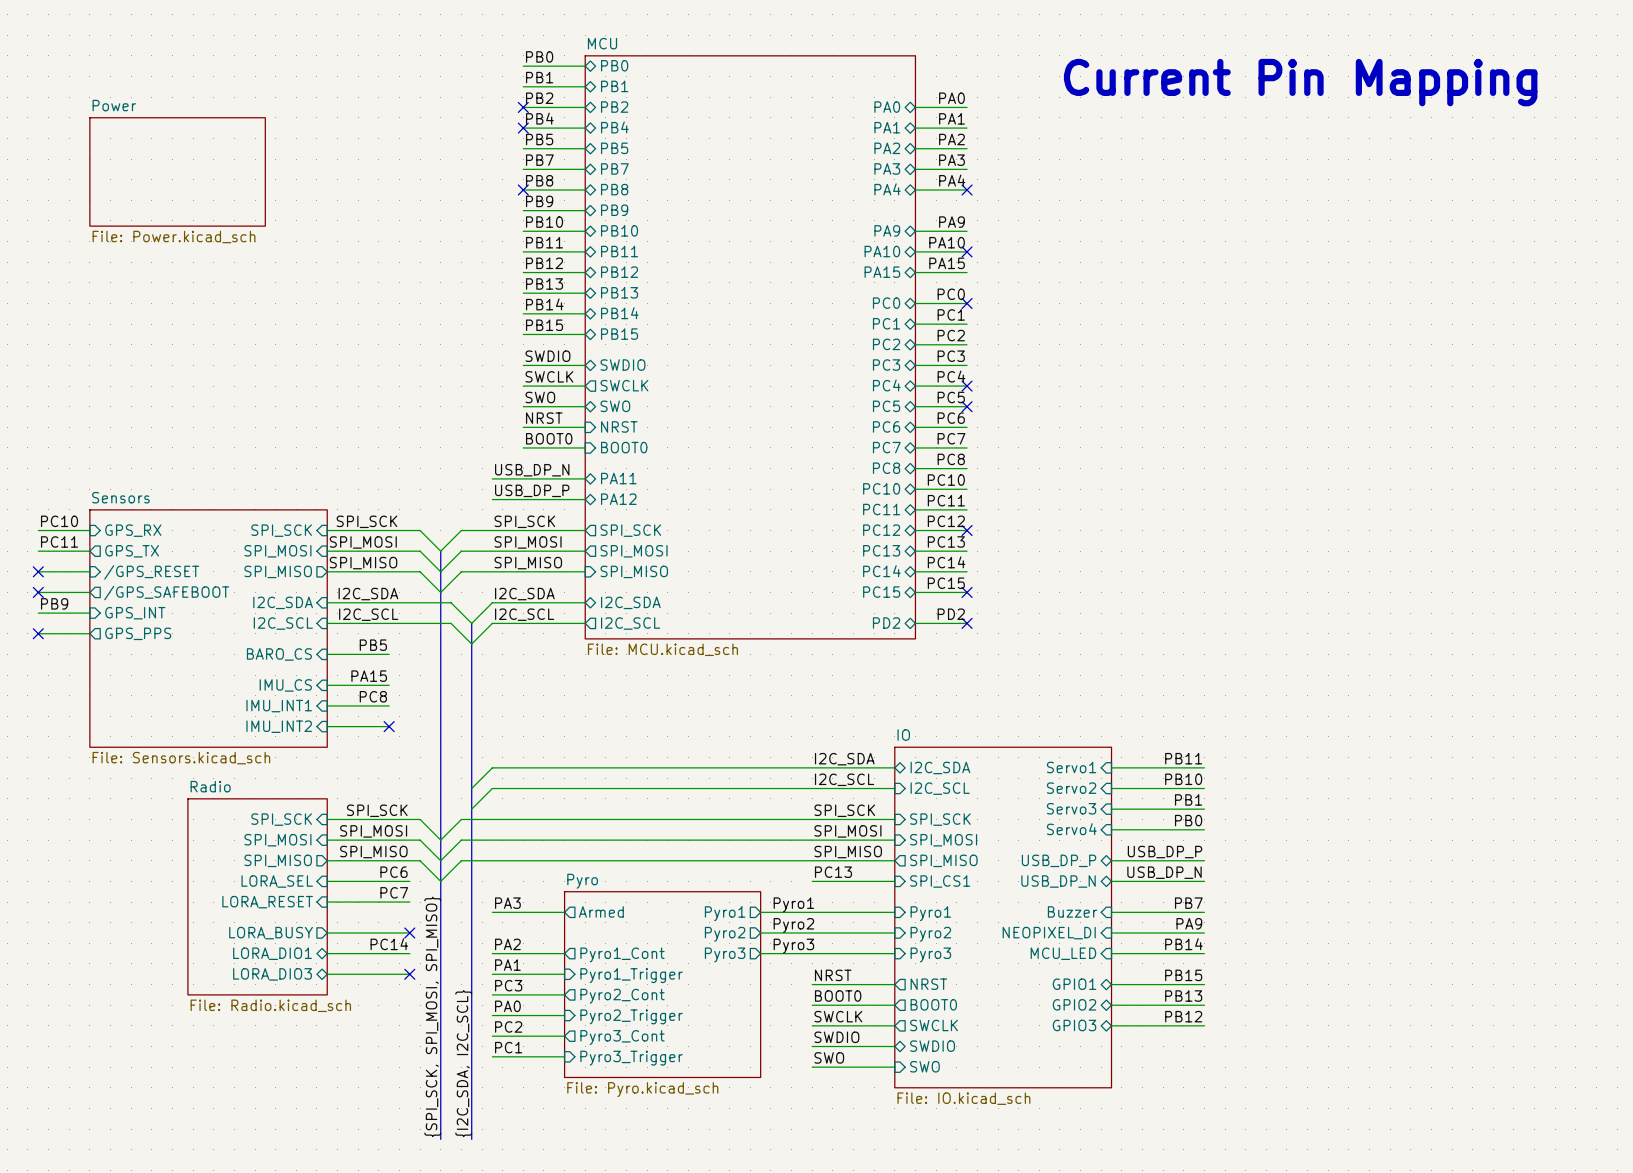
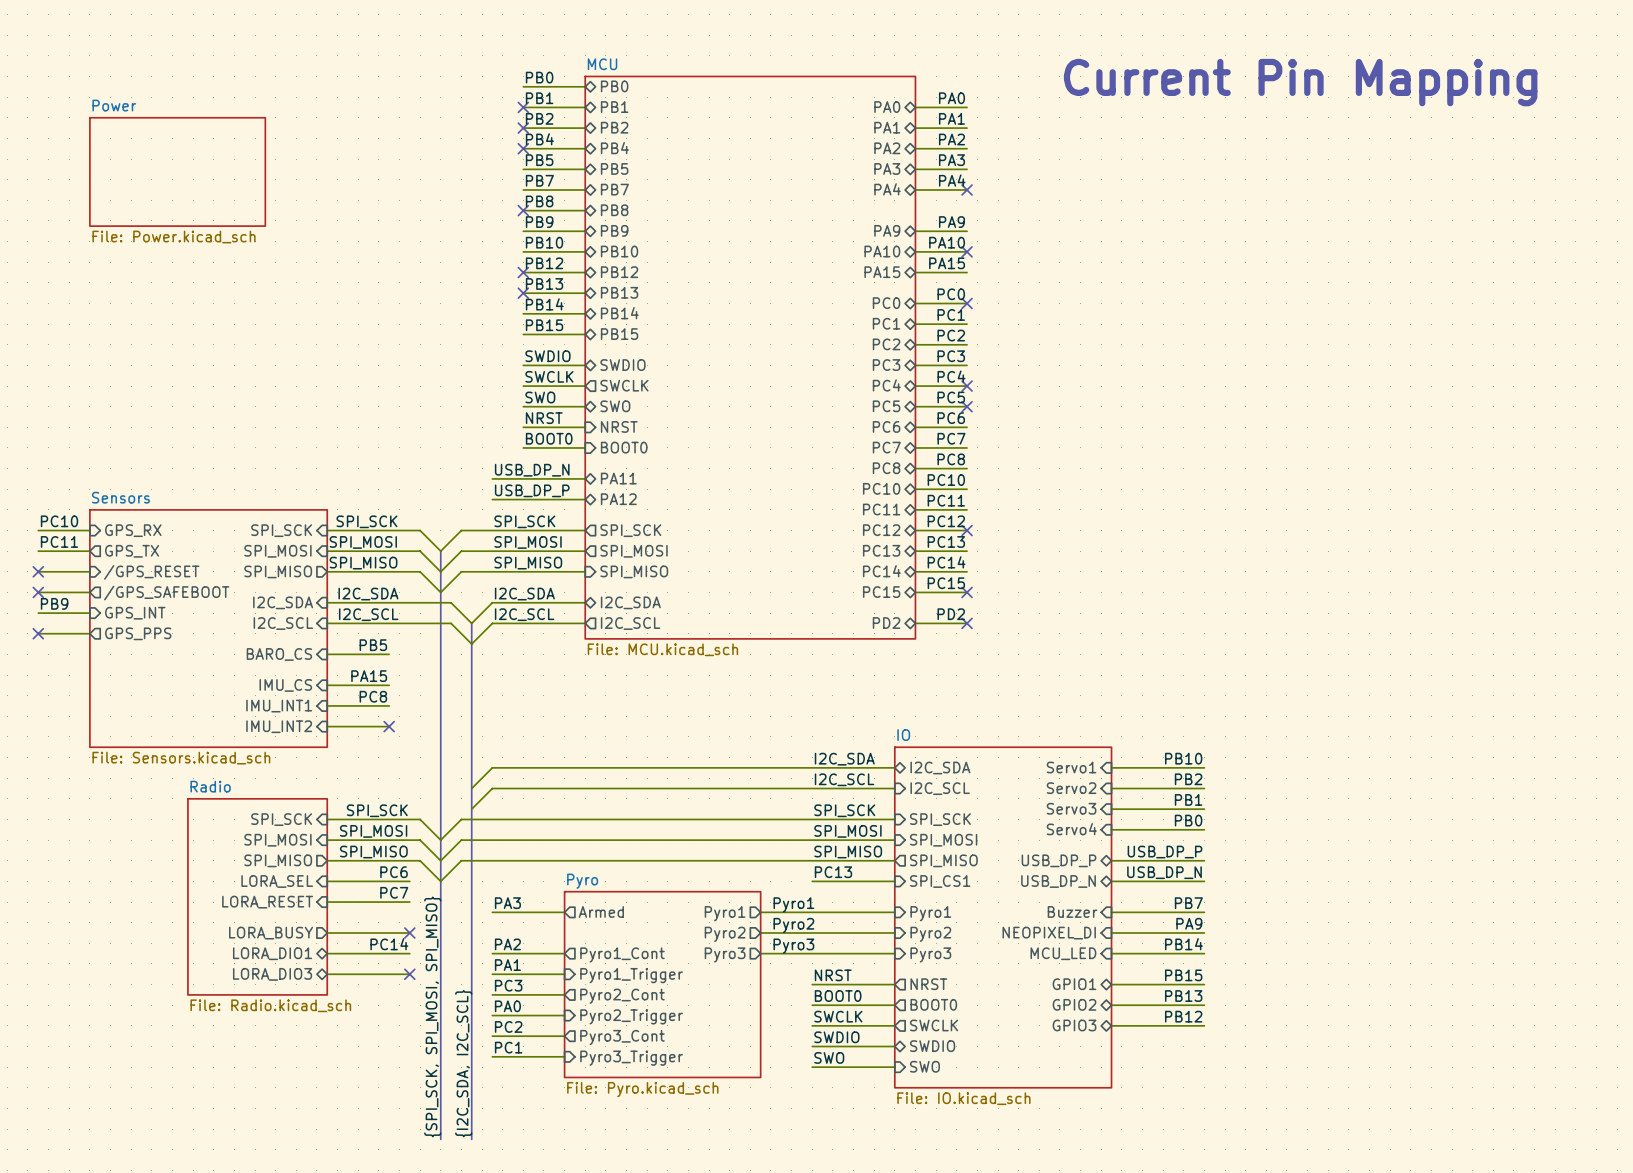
label: PB0 (539, 56) -> none
sheet pin: PB0 (614, 65) -> none
wire: (523, 66) (585, 66) -> none
label: PB1 (539, 77) -> PB0 (539, 77)
sheet pin: PB1 (614, 86) -> PB0 (614, 86)
label: PB2 (539, 98) -> PB1 (539, 98)
sheet pin: PB2 (614, 107) -> PB1 (614, 107)
label: PB4 (539, 118) -> PB2 (539, 118)
sheet pin: PB4 (614, 127) -> PB2 (614, 127)
label: PB5 (539, 139) -> PB4 (539, 139)
no-connect mark: none -> (523, 148)
sheet pin: PB5 (614, 148) -> PB4 (614, 148)
label: PB7 (539, 160) -> PB5 (539, 160)
sheet pin: PB7 (614, 168) -> PB5 (614, 168)
label: PB8 (539, 180) -> PB7 (539, 180)
no-connect mark: (523, 189) -> none
sheet pin: PB8 (614, 189) -> PB7 (614, 189)
label: PB9 (539, 201) -> PB8 (539, 201)
no-connect mark: none -> (523, 210)
sheet pin: PB9 (614, 210) -> PB8 (614, 210)
label: PB10 (544, 222) -> PB9 (539, 222)
sheet pin: PB10 (619, 230) -> PB9 (614, 230)
label: PB11 (544, 242) -> PB10 (544, 242)
sheet pin: PB11 (619, 251) -> PB10 (619, 251)
no-connect mark: none -> (523, 272)
no-connect mark: none -> (523, 293)
sheet MCU: File: MCU.kicad_sch (750, 347) -> none
sheet MCU: none -> File: MCU.kicad_sch (750, 357)
label: PB11 (1183, 758) -> PB10 (1183, 758)
label: PB10 (1183, 779) -> PB2 (1188, 779)

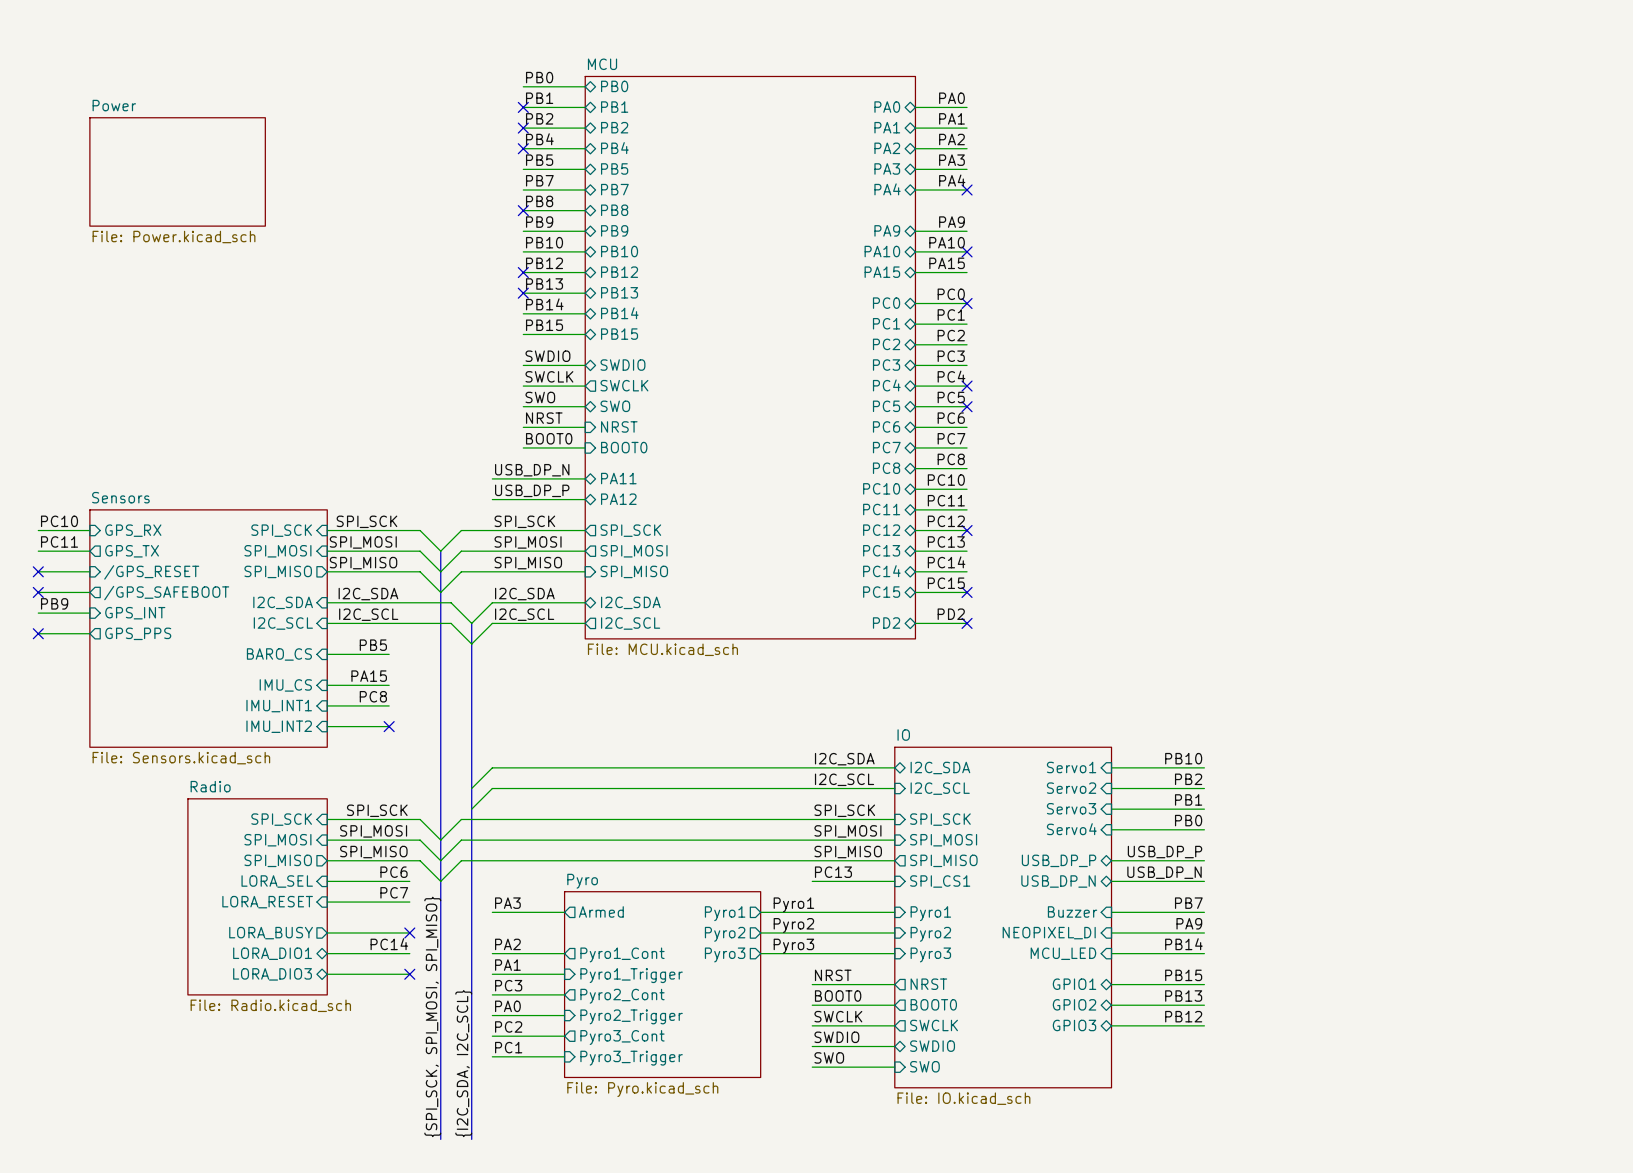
text: Current Pin Mapping (1300, 82) -> none

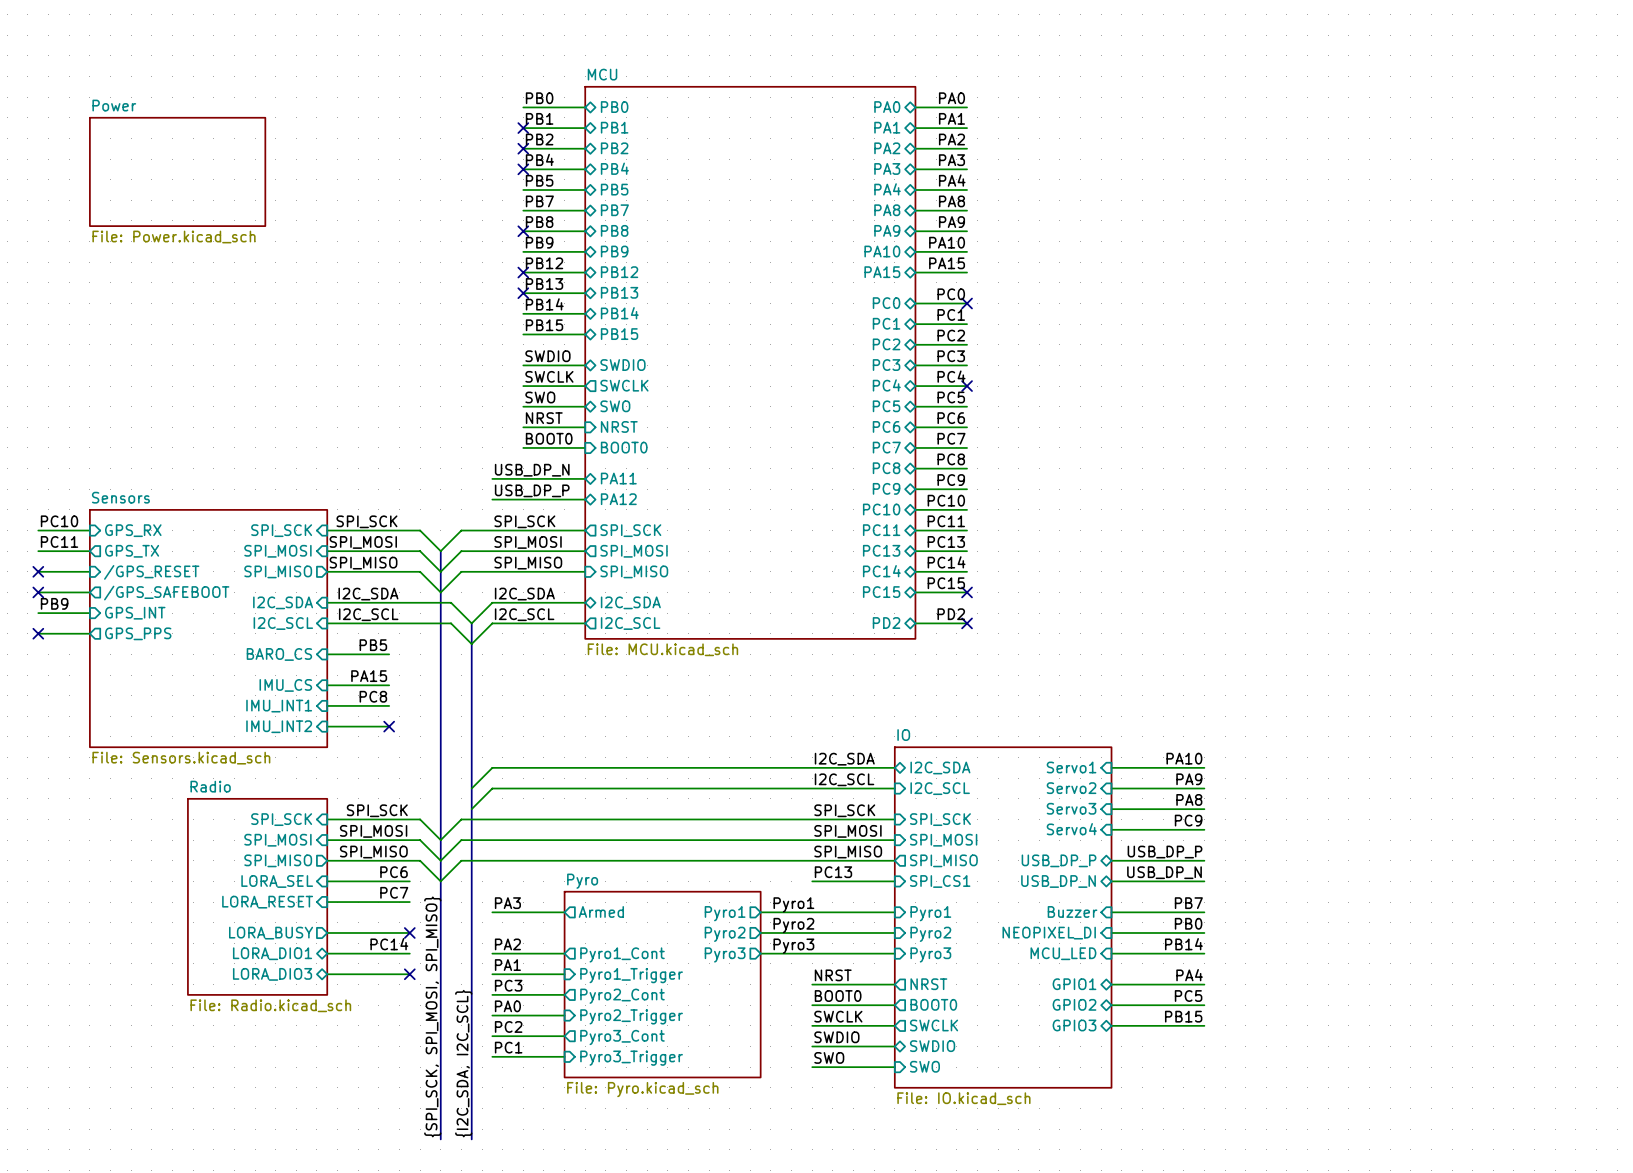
sheet MCU shape: [584, 75, 917, 640] -> [584, 86, 917, 640]
label: PB0 (539, 77) -> none
wire: (523, 86) (585, 86) -> none
sheet pin: PB0 (614, 86) -> none
label: PB1 (539, 98) -> PB0 (539, 98)
no-connect mark: (523, 107) -> none
sheet pin: PB1 (614, 107) -> PB0 (614, 107)
label: PB2 (539, 118) -> PB1 (539, 118)
sheet pin: PB2 (614, 127) -> PB1 (614, 127)
label: PB4 (539, 139) -> PB2 (539, 139)
sheet pin: PB4 (614, 148) -> PB2 (614, 148)
label: PB5 (539, 160) -> PB4 (539, 159)
sheet pin: PB5 (614, 168) -> PB4 (614, 168)
no-connect mark: none -> (523, 169)
label: PB7 (539, 180) -> PB5 (539, 180)
sheet pin: PB7 (614, 189) -> PB5 (614, 189)
no-connect mark: (967, 189) -> none
label: PB8 (539, 201) -> PB7 (539, 201)
label: none -> PA8 (951, 201)
no-connect mark: (523, 210) -> none
sheet pin: PB8 (614, 210) -> PB7 (614, 210)
sheet pin: none -> PA8 (887, 210)
wire: none -> (915, 210) (967, 210)
label: PB9 (539, 222) -> PB8 (539, 222)
sheet pin: PB9 (614, 230) -> PB8 (614, 230)
no-connect mark: none -> (523, 231)
label: PB10 (544, 242) -> PB9 (539, 242)
sheet pin: PB10 (619, 251) -> PB9 (614, 251)
no-connect mark: (967, 251) -> none
no-connect mark: (967, 406) -> none
label: PC10 (946, 480) -> PC9 (951, 480)
sheet pin: PC10 (881, 488) -> PC9 (886, 488)
label: PC11 (946, 500) -> PC10 (946, 500)
sheet pin: PC11 (881, 509) -> PC10 (881, 509)
label: PC12 (946, 521) -> PC11 (946, 521)
sheet pin: PC12 (881, 530) -> PC11 (881, 530)
no-connect mark: (967, 530) -> none
label: PB10 (1183, 758) -> PA10 (1184, 758)
label: PB2 (1188, 779) -> PA9 (1189, 779)
label: PB1 (1188, 799) -> PA8 (1189, 799)
label: PB0 (1188, 820) -> PC9 (1188, 820)
label: PA9 (1189, 923) -> PB0 (1188, 923)
label: PB15 (1183, 975) -> PA4 (1189, 975)
label: PB13 (1183, 996) -> PC5 (1188, 996)
label: PB12 (1183, 1016) -> PB15 (1183, 1016)

